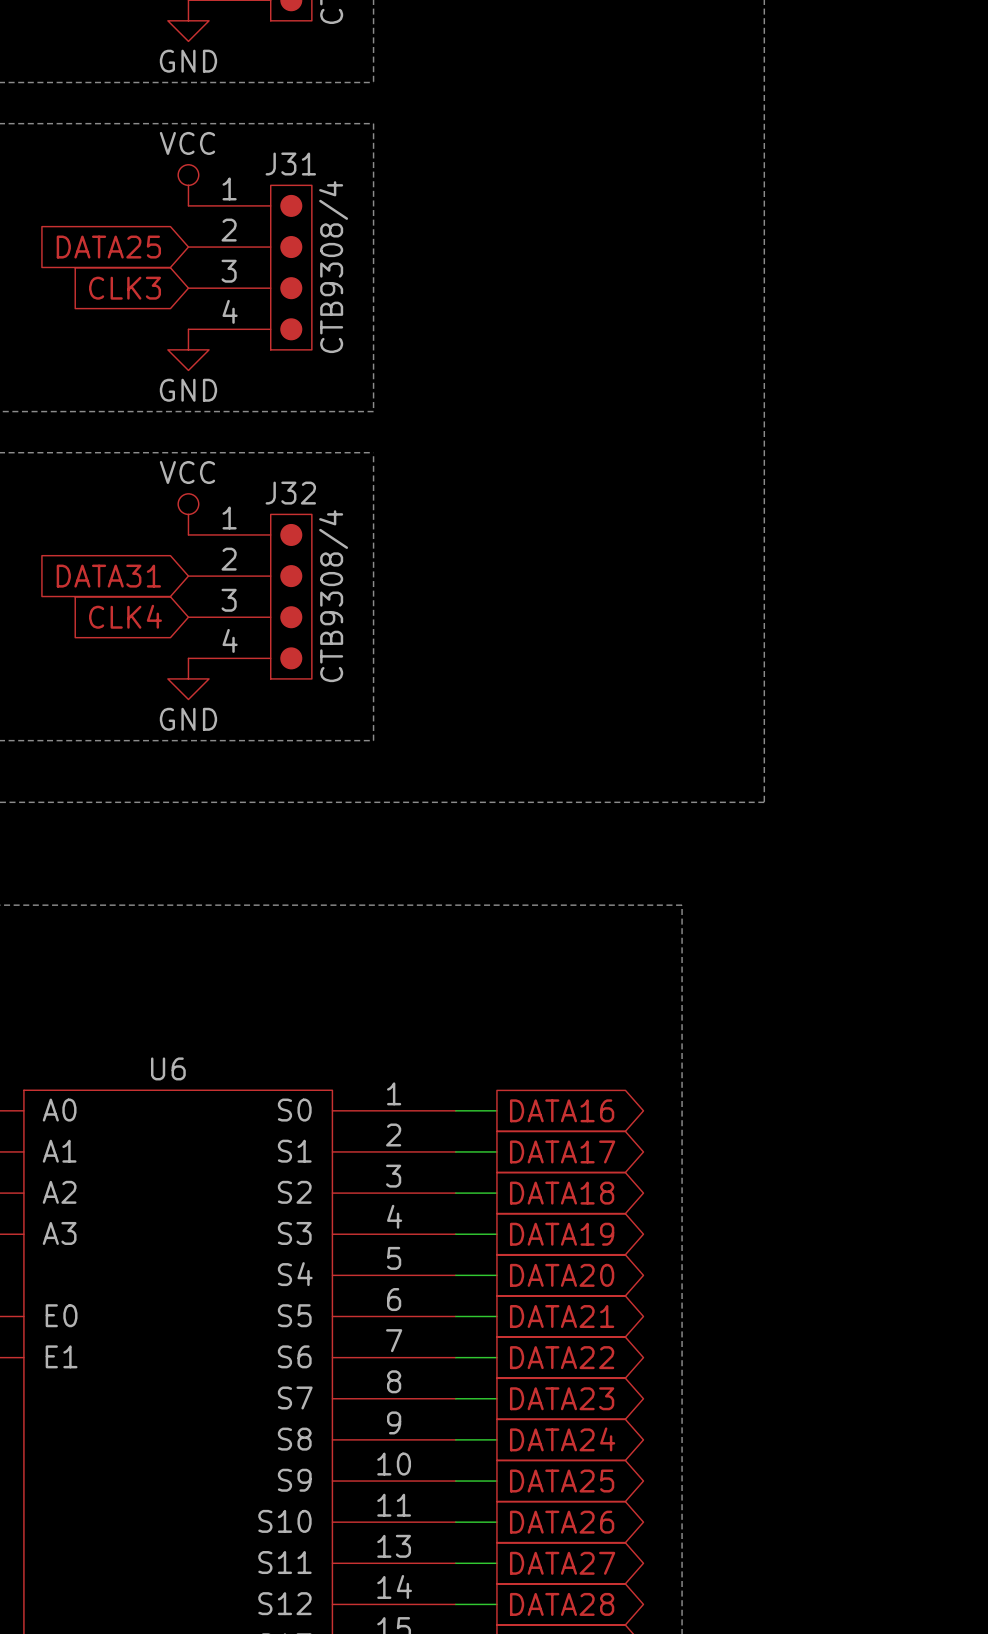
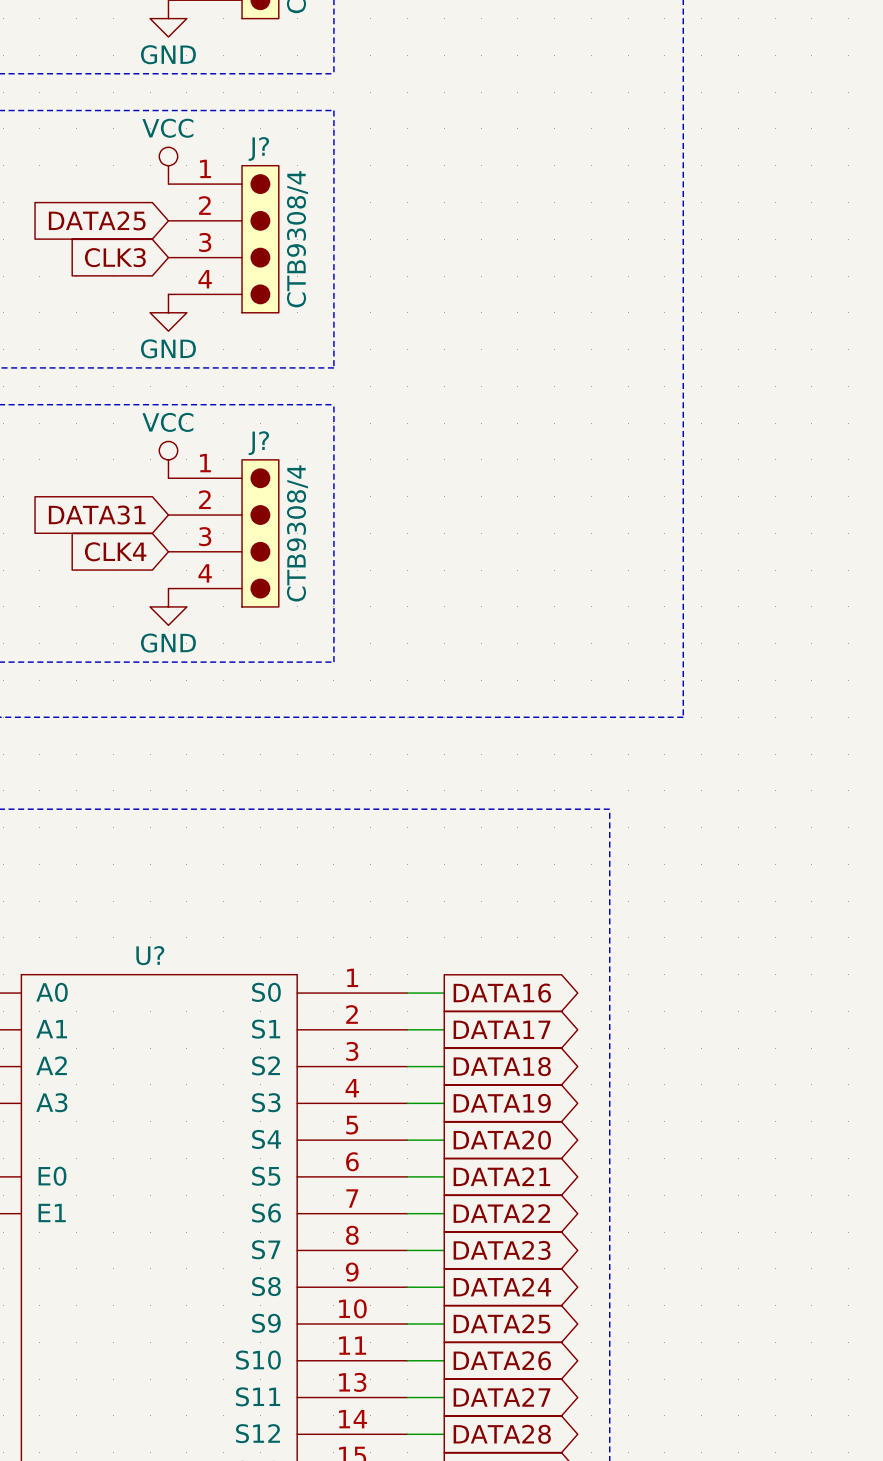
J31 name: J31 (290, 164) -> J? (258, 148)
J32 name: J32 (290, 493) -> J? (258, 443)
U6 name: U6 (168, 1068) -> U? (150, 955)

